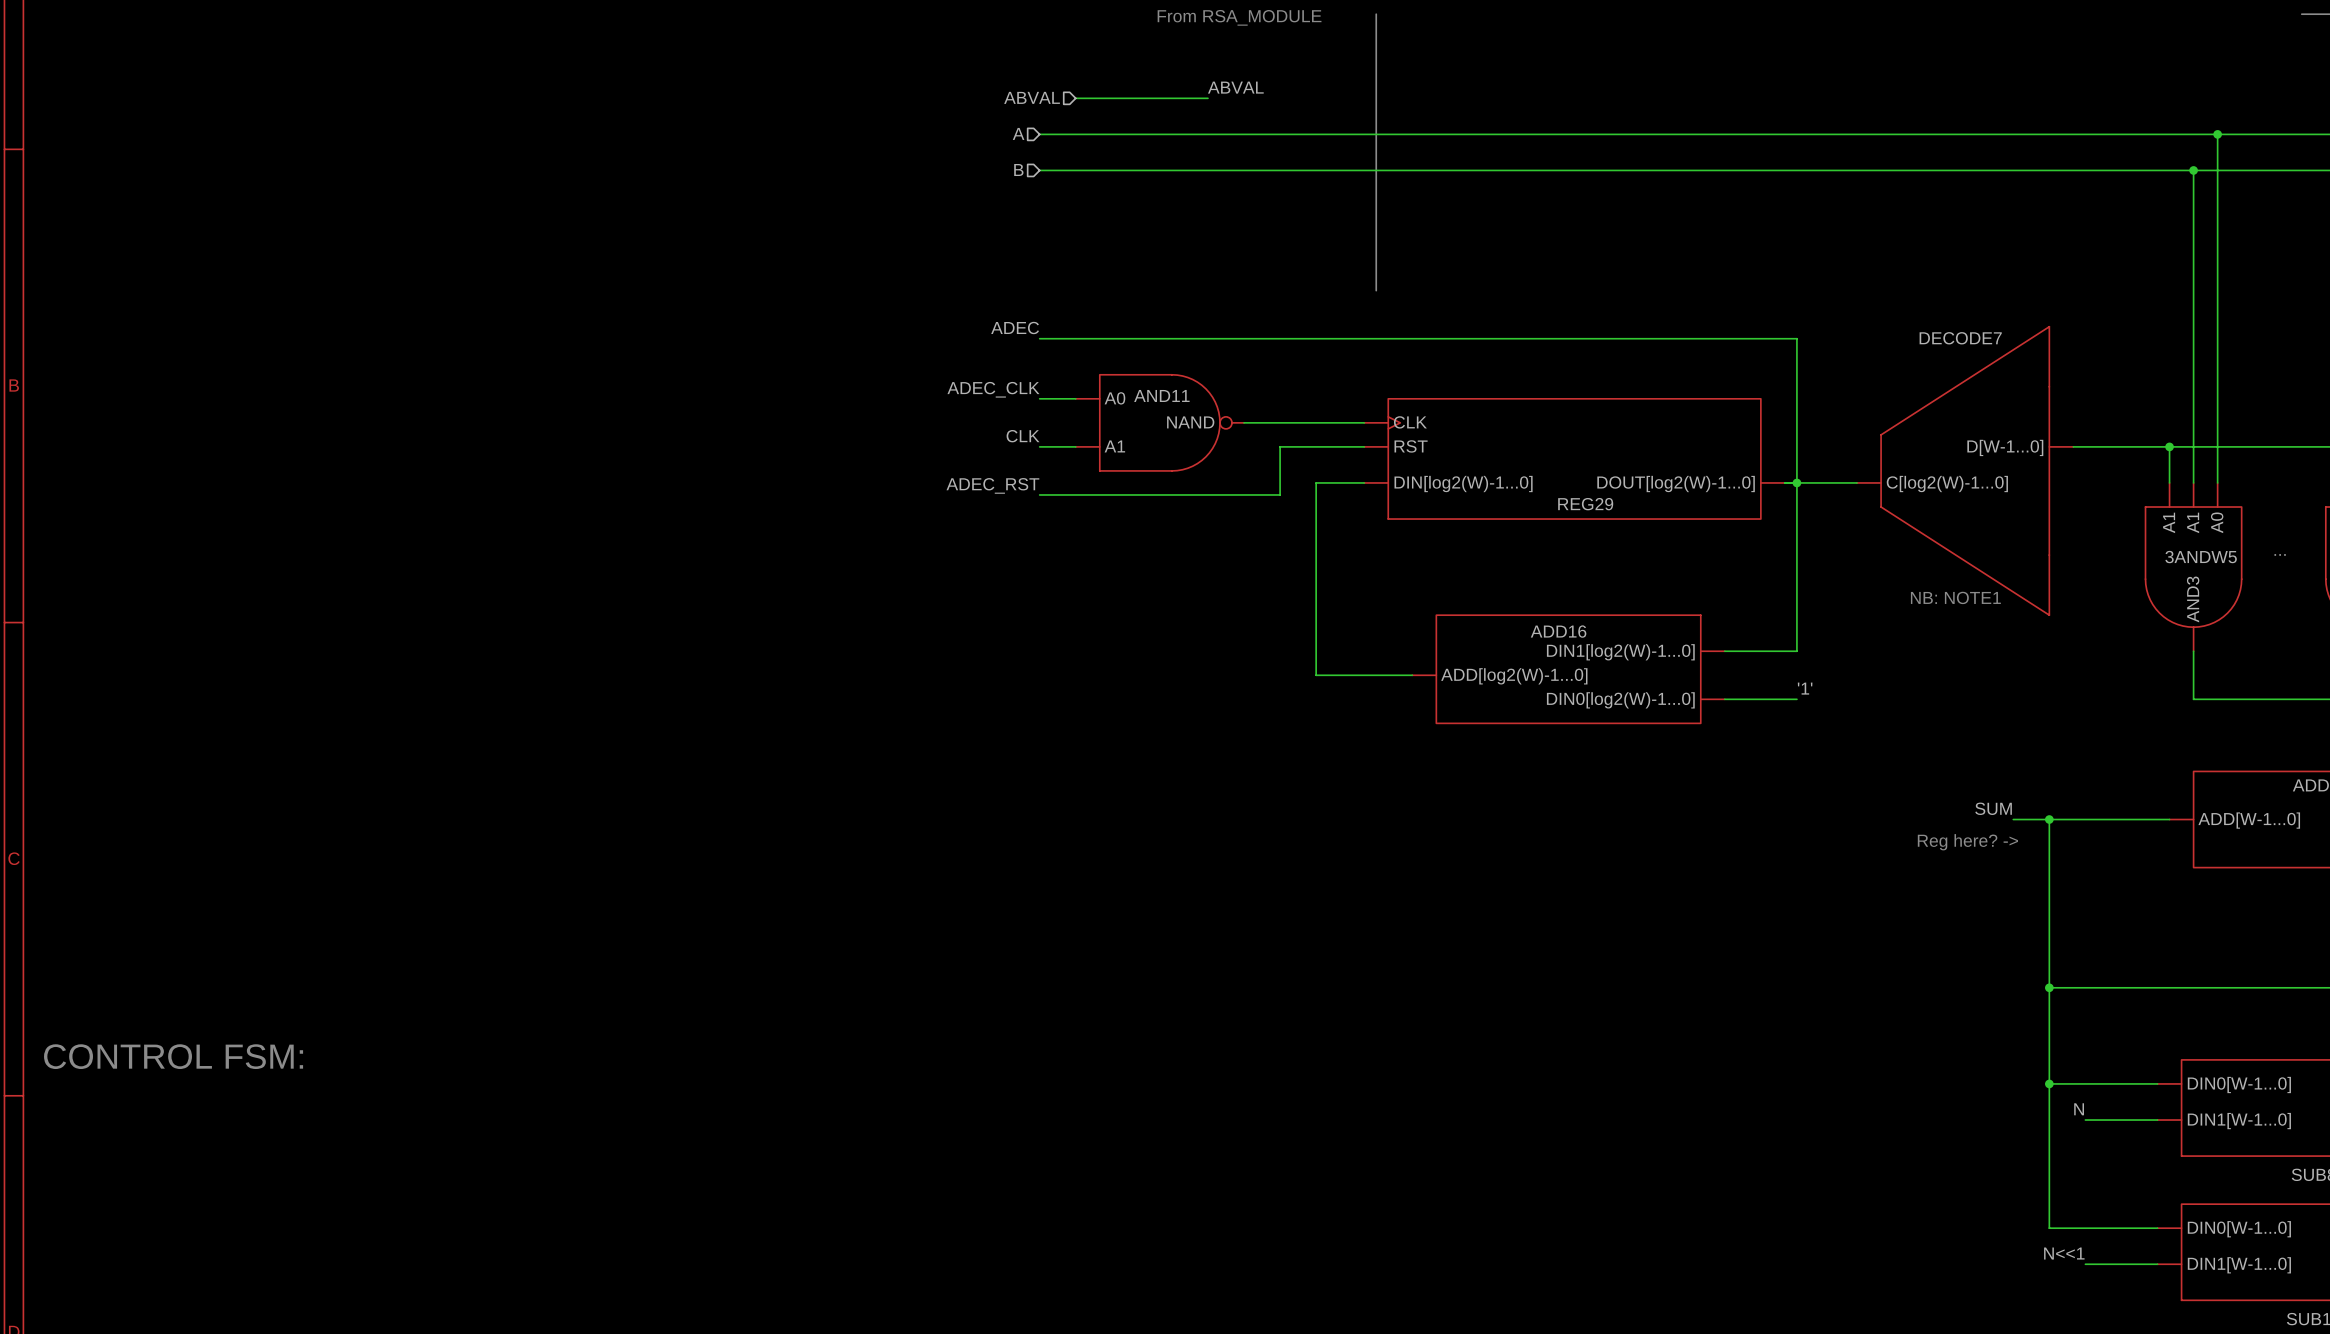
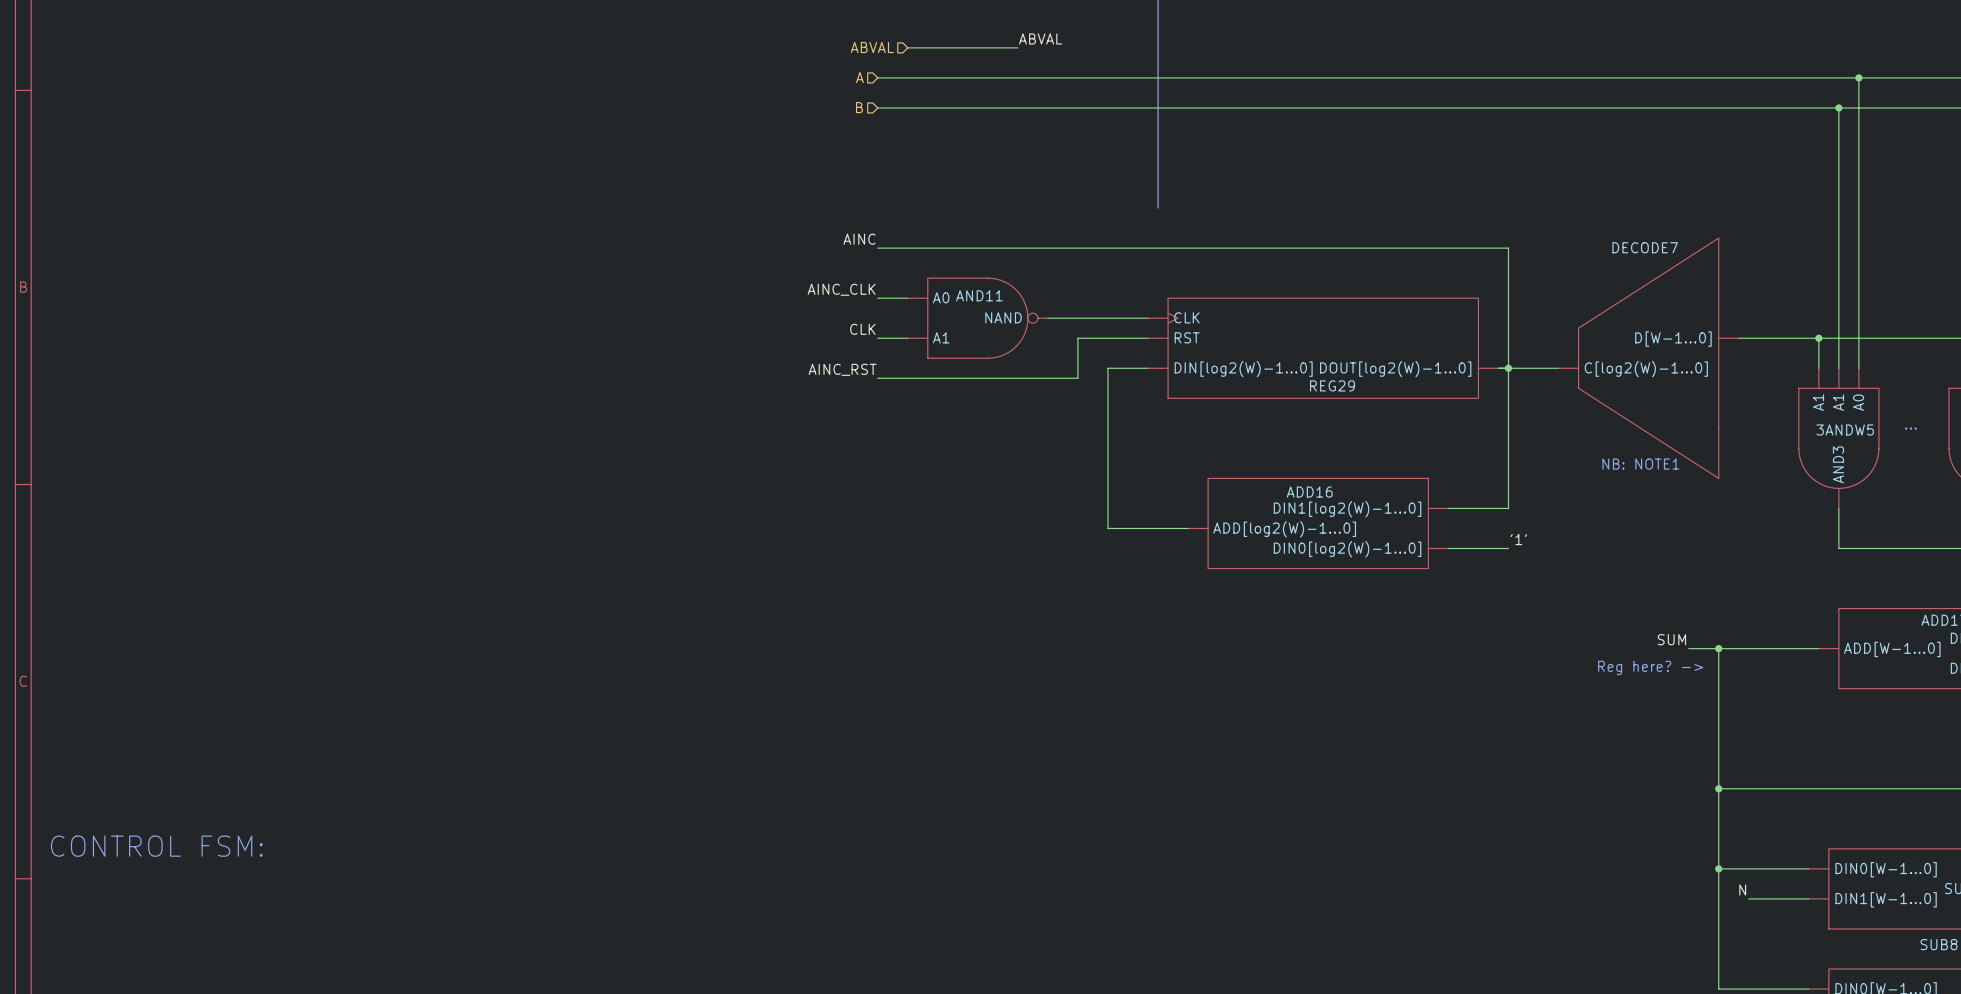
label: ADEC (1015, 328) -> AINC (859, 239)
label: ADEC_CLK (993, 389) -> AINC_CLK (841, 289)
label: ADEC_RST (992, 485) -> AINC_RST (842, 369)

